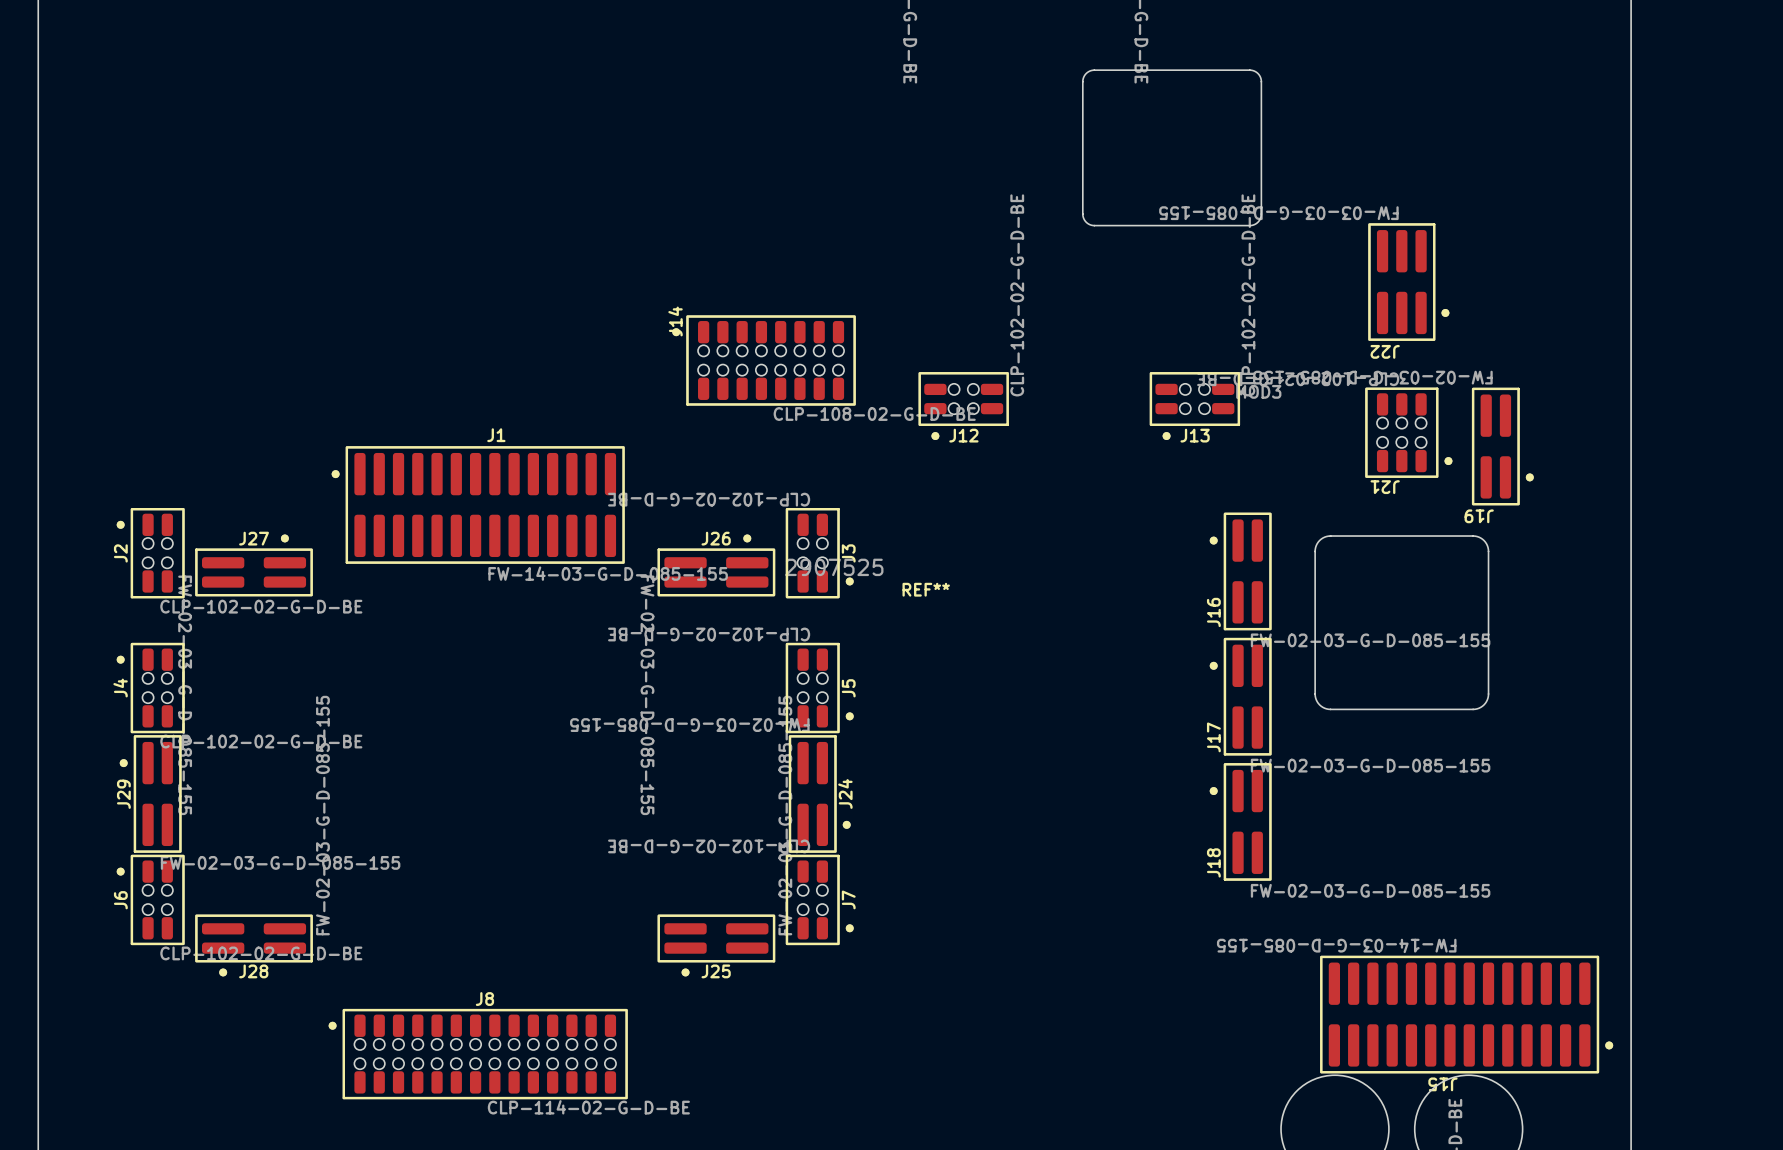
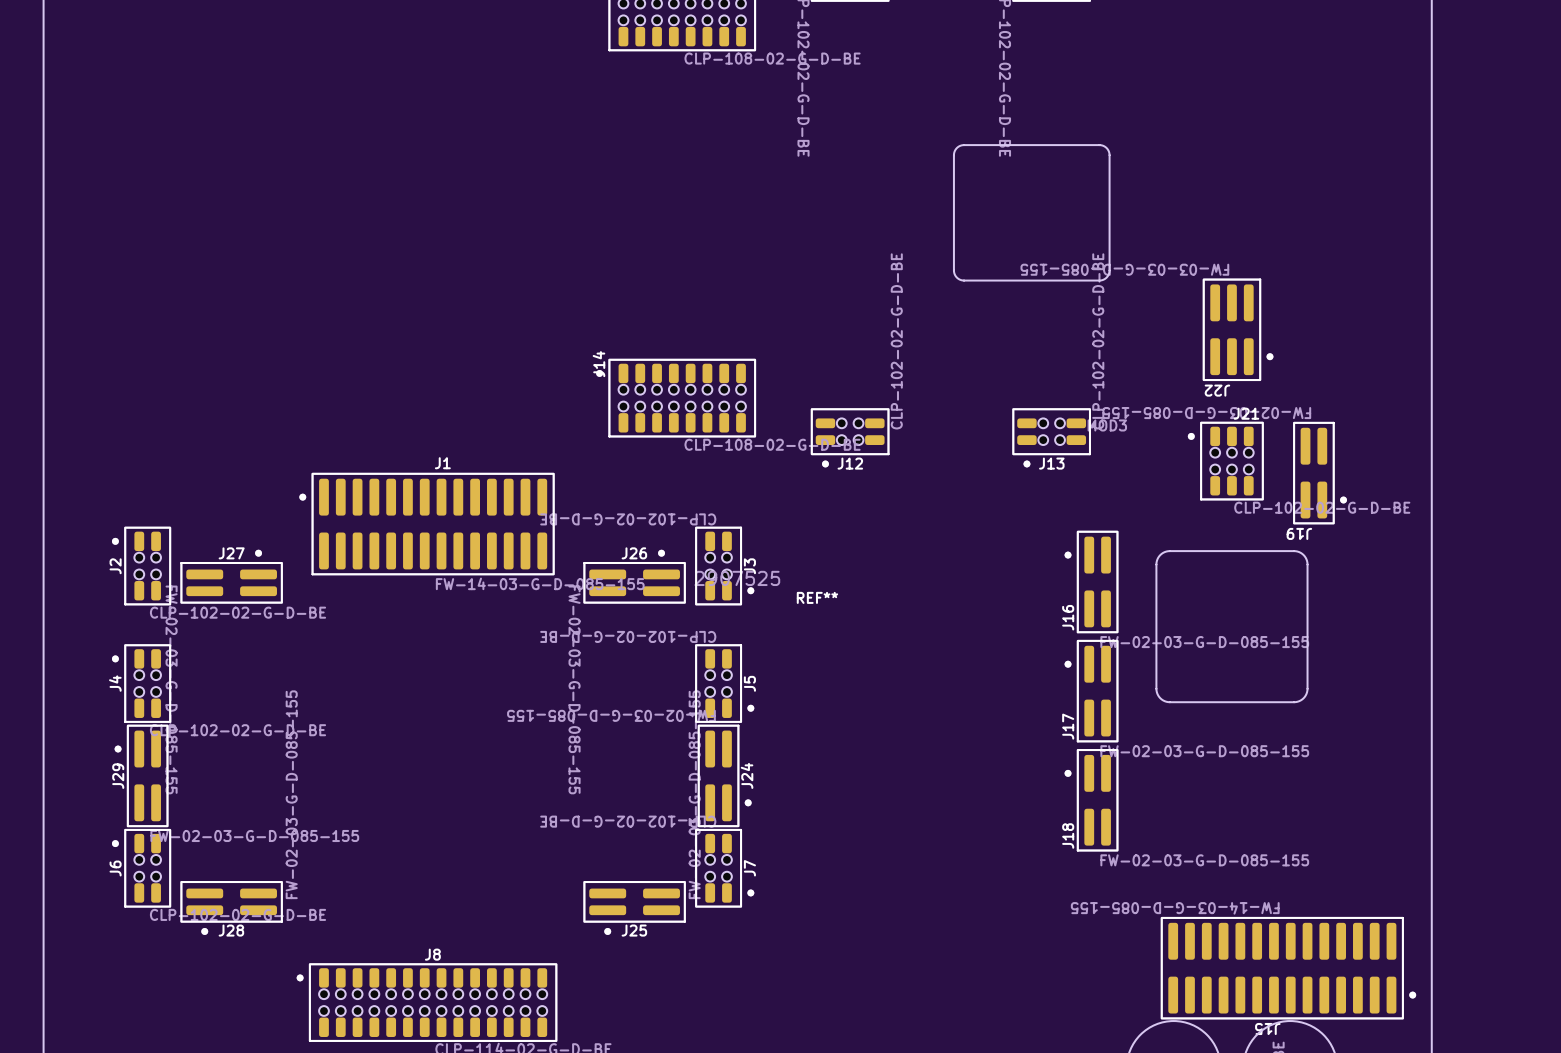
J21 rotation: 0° (1408, 432) -> 180° (1225, 461)

